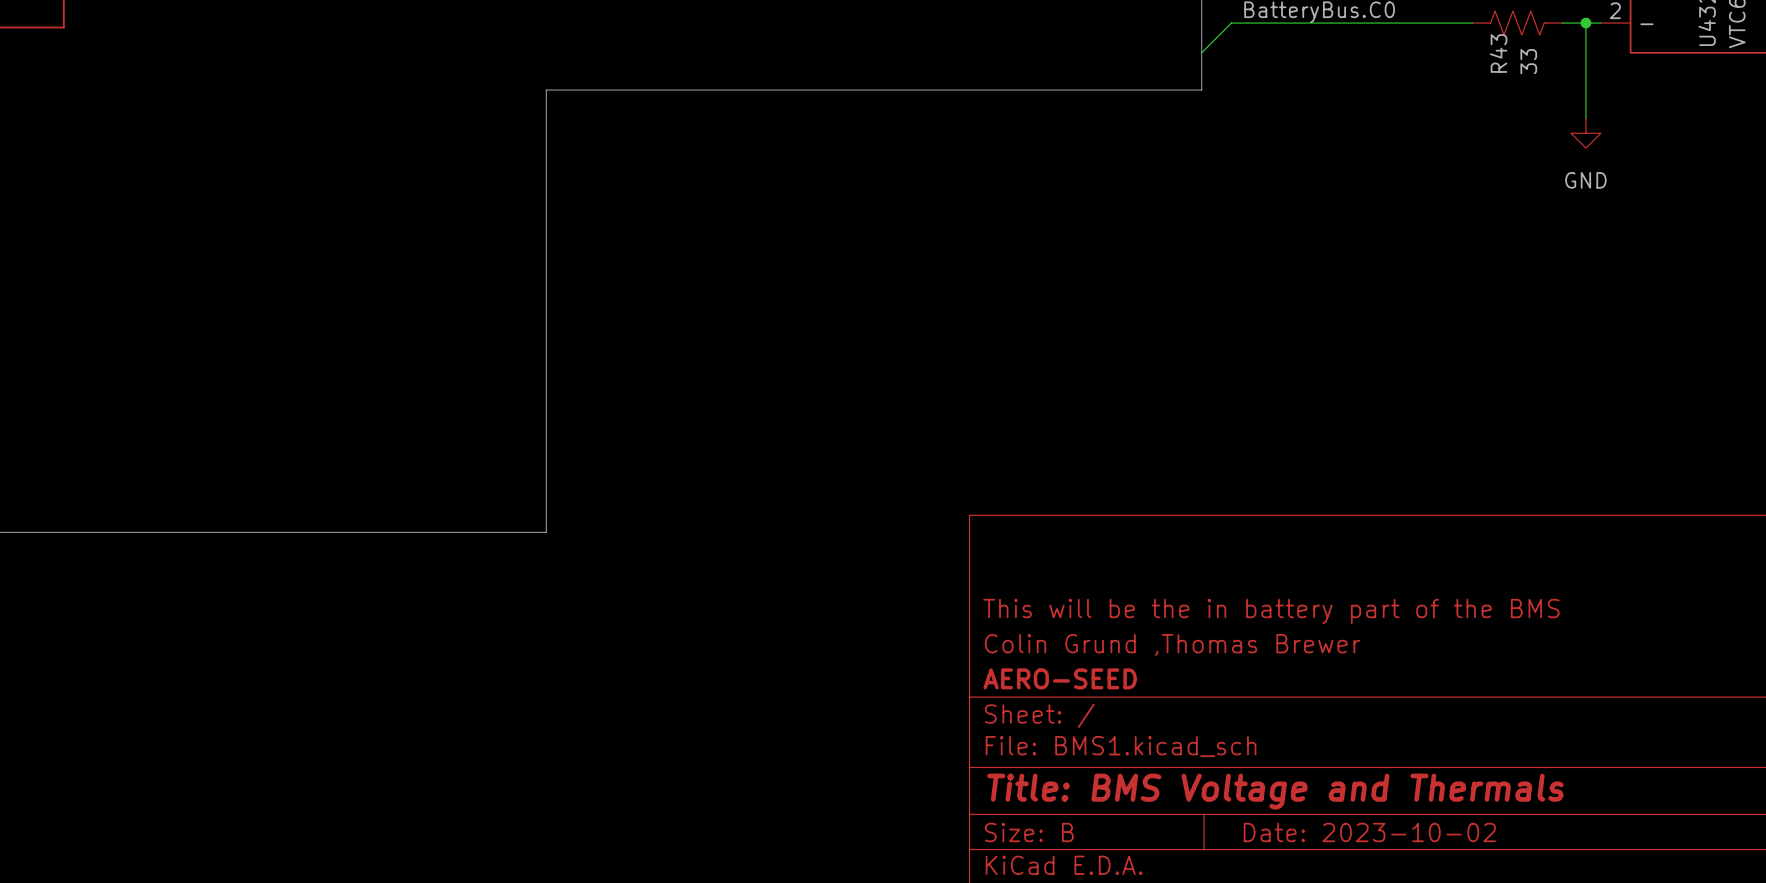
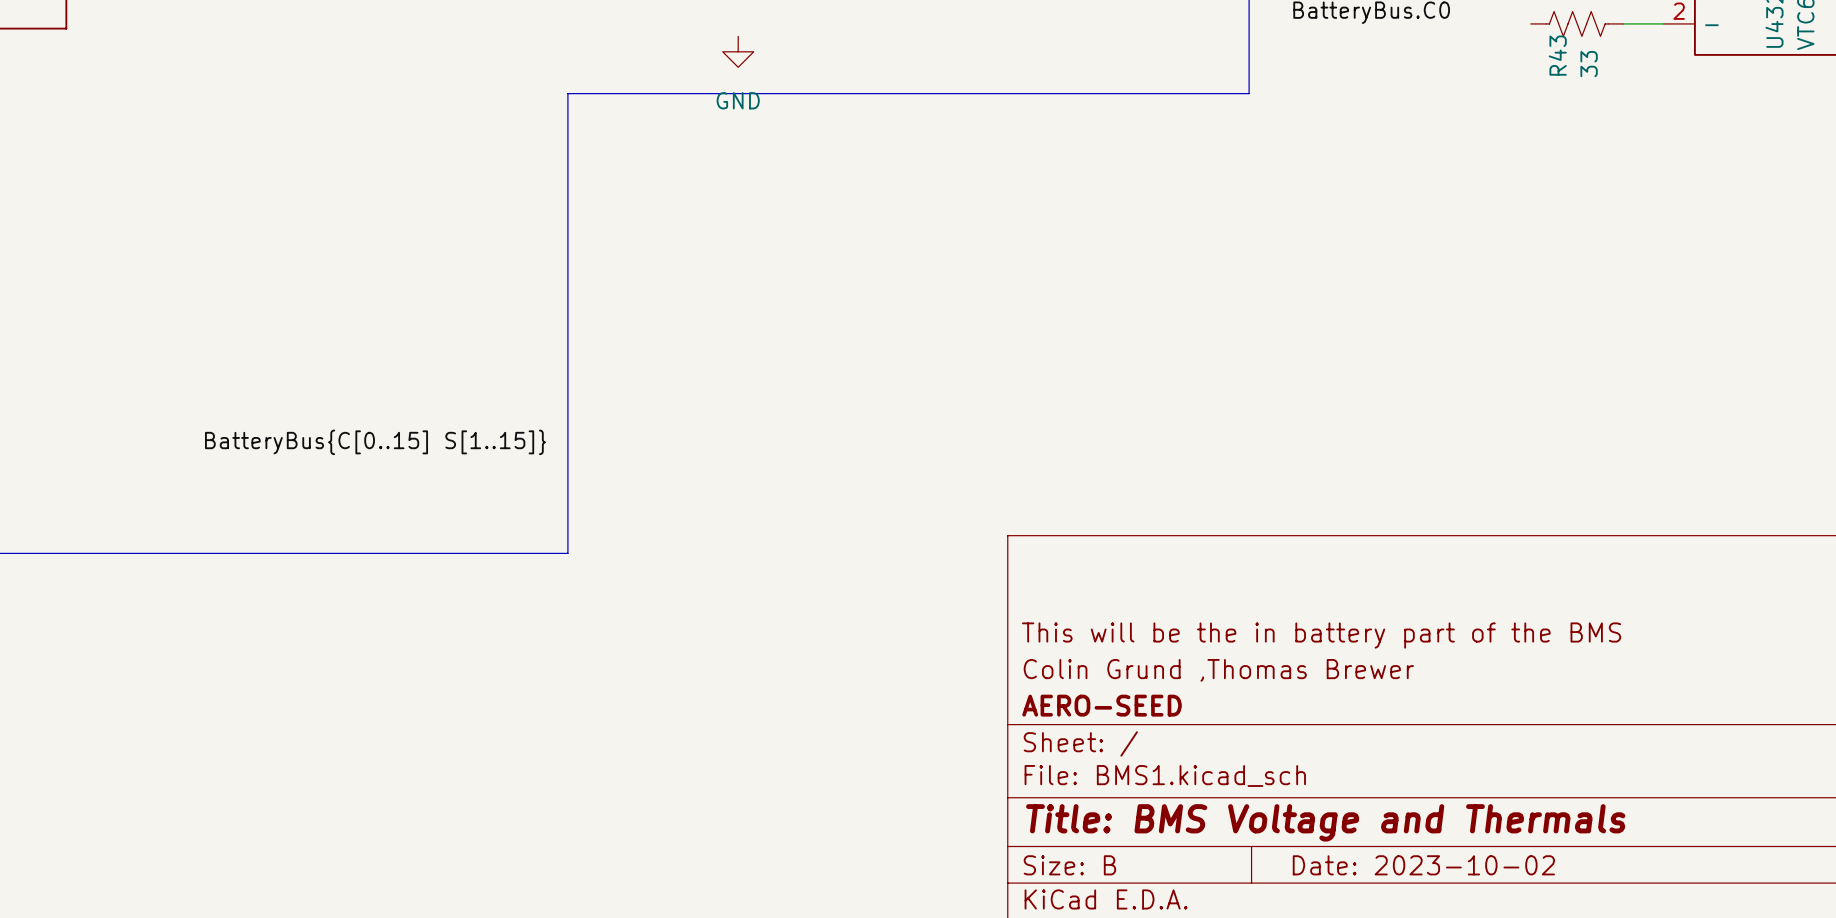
wire: (1472, 23) (1231, 23) (1201, 52) -> none
wire: (1585, 23) (1585, 118) -> none
junction: (1585, 23) -> none
power symbol: none -> GND (738, 51)
power symbol: GND (1585, 133) -> none
label: none -> BatteryBus{C[0..15] S[1..15]} (375, 442)

